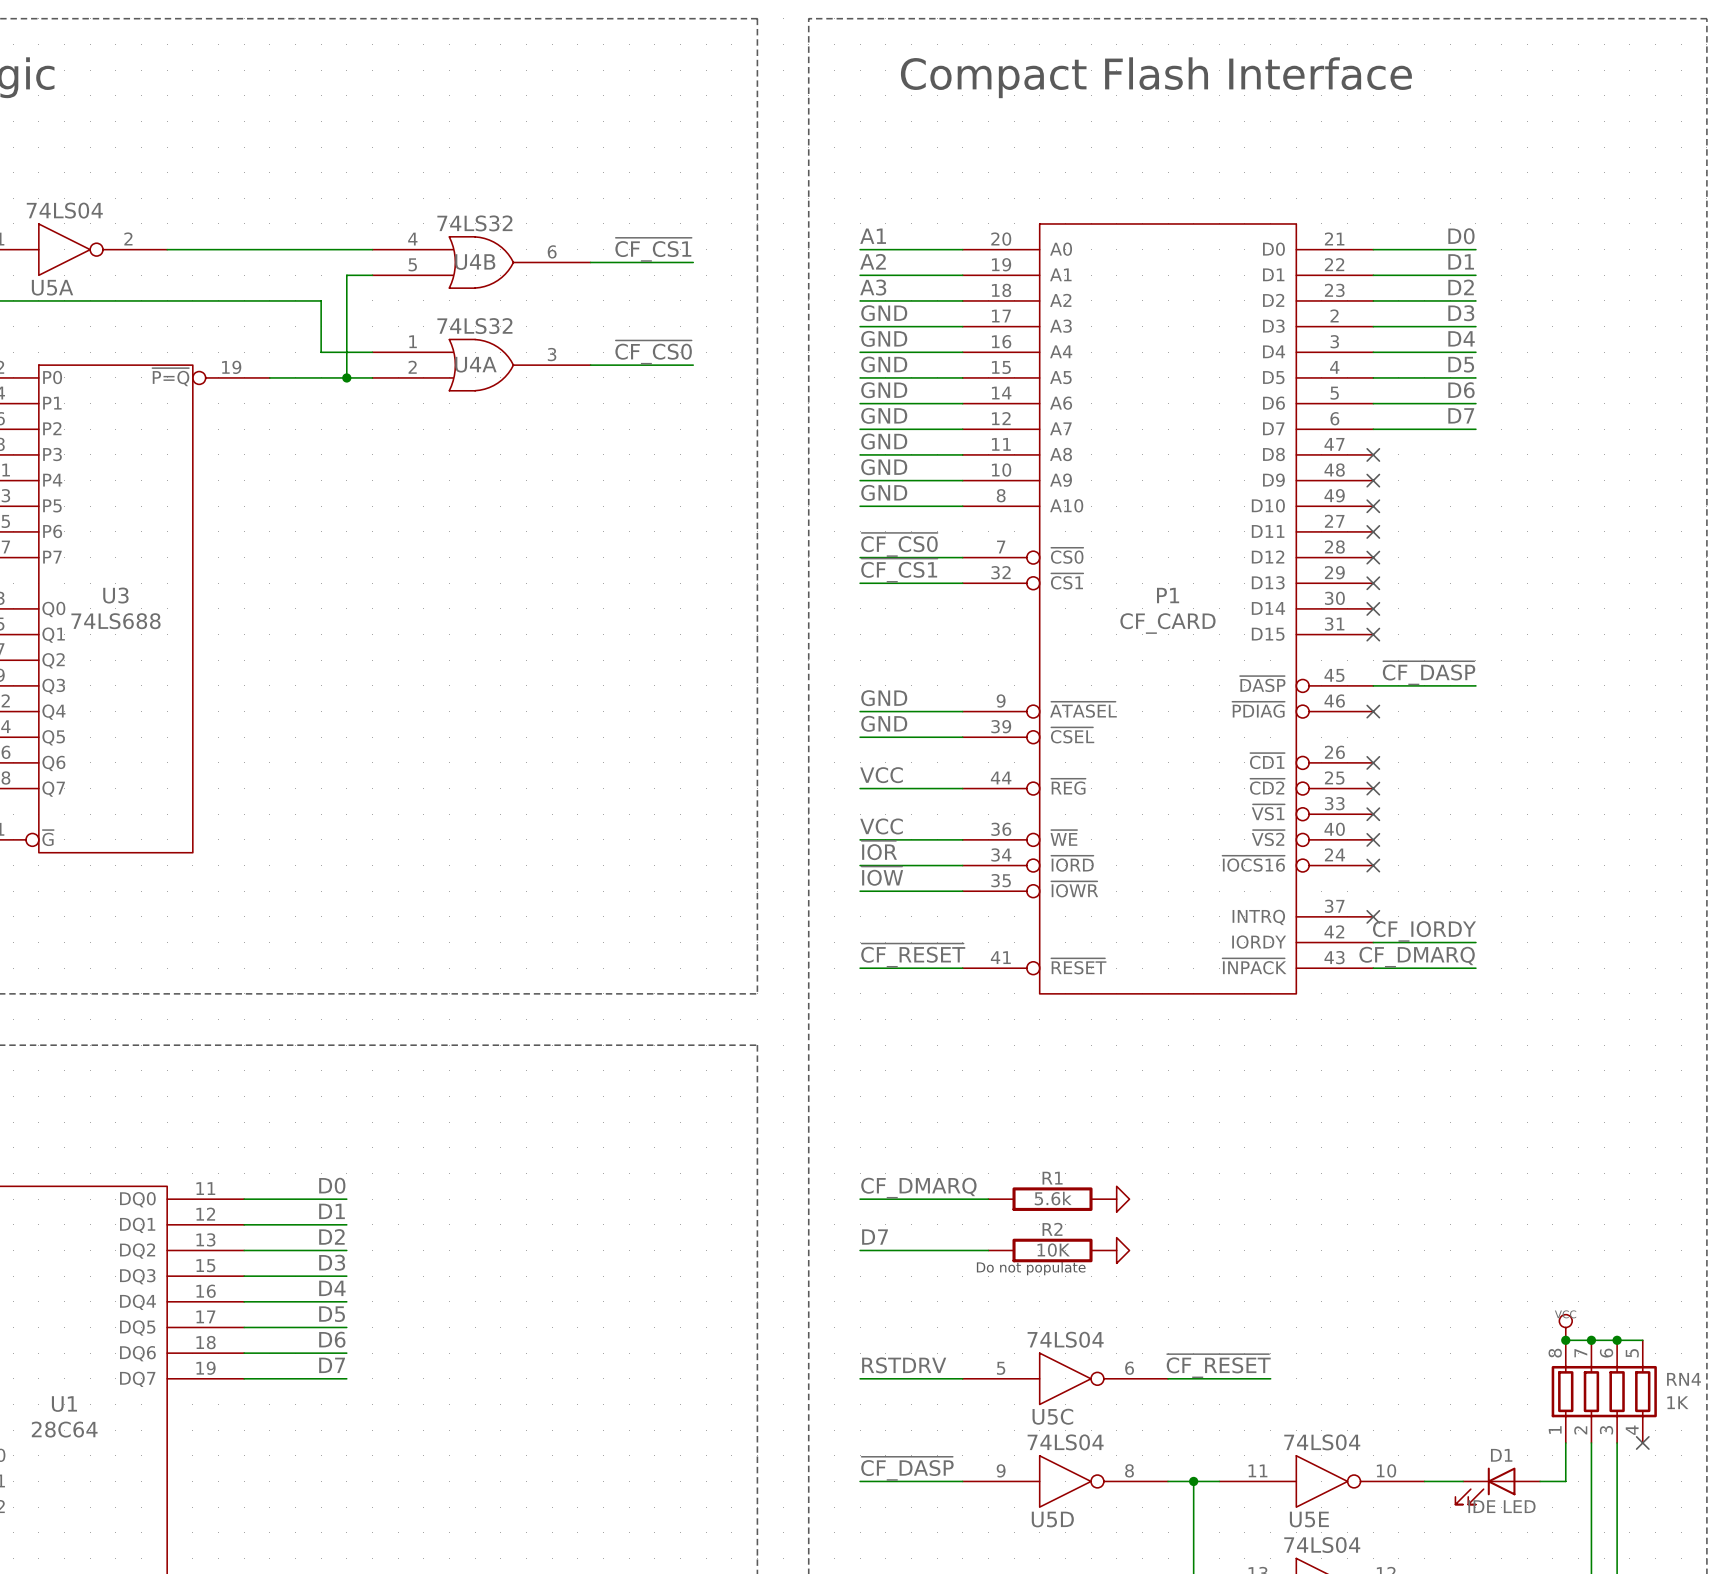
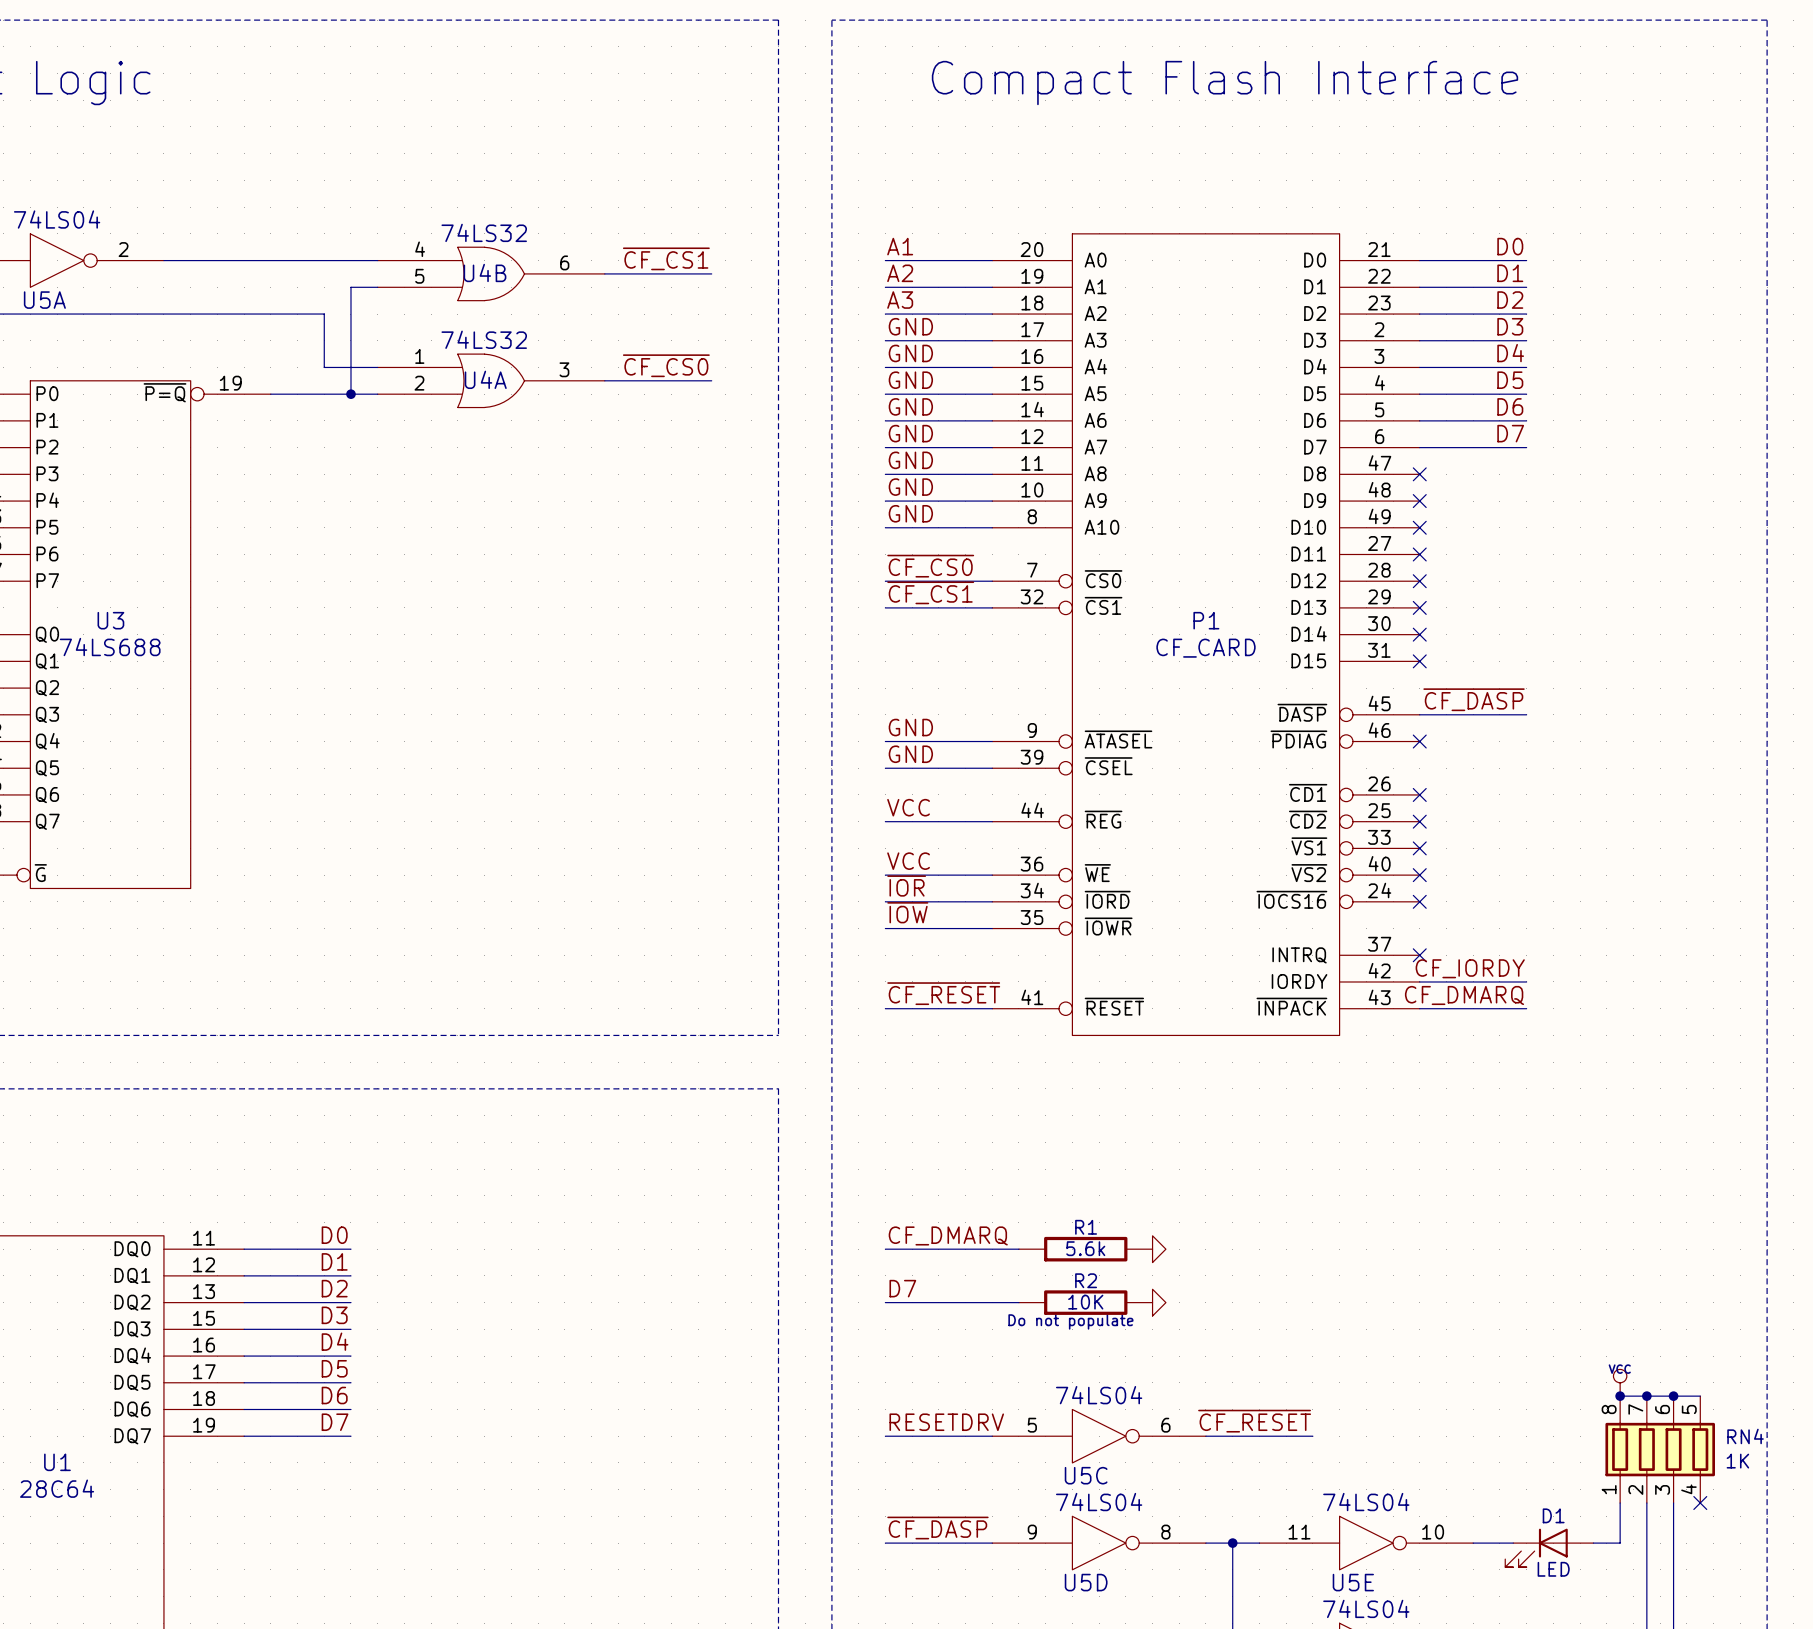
label: RSTDRV (904, 1365) -> RESETDRV (946, 1422)
D1 value: IDE LED (1501, 1506) -> LED (1553, 1569)

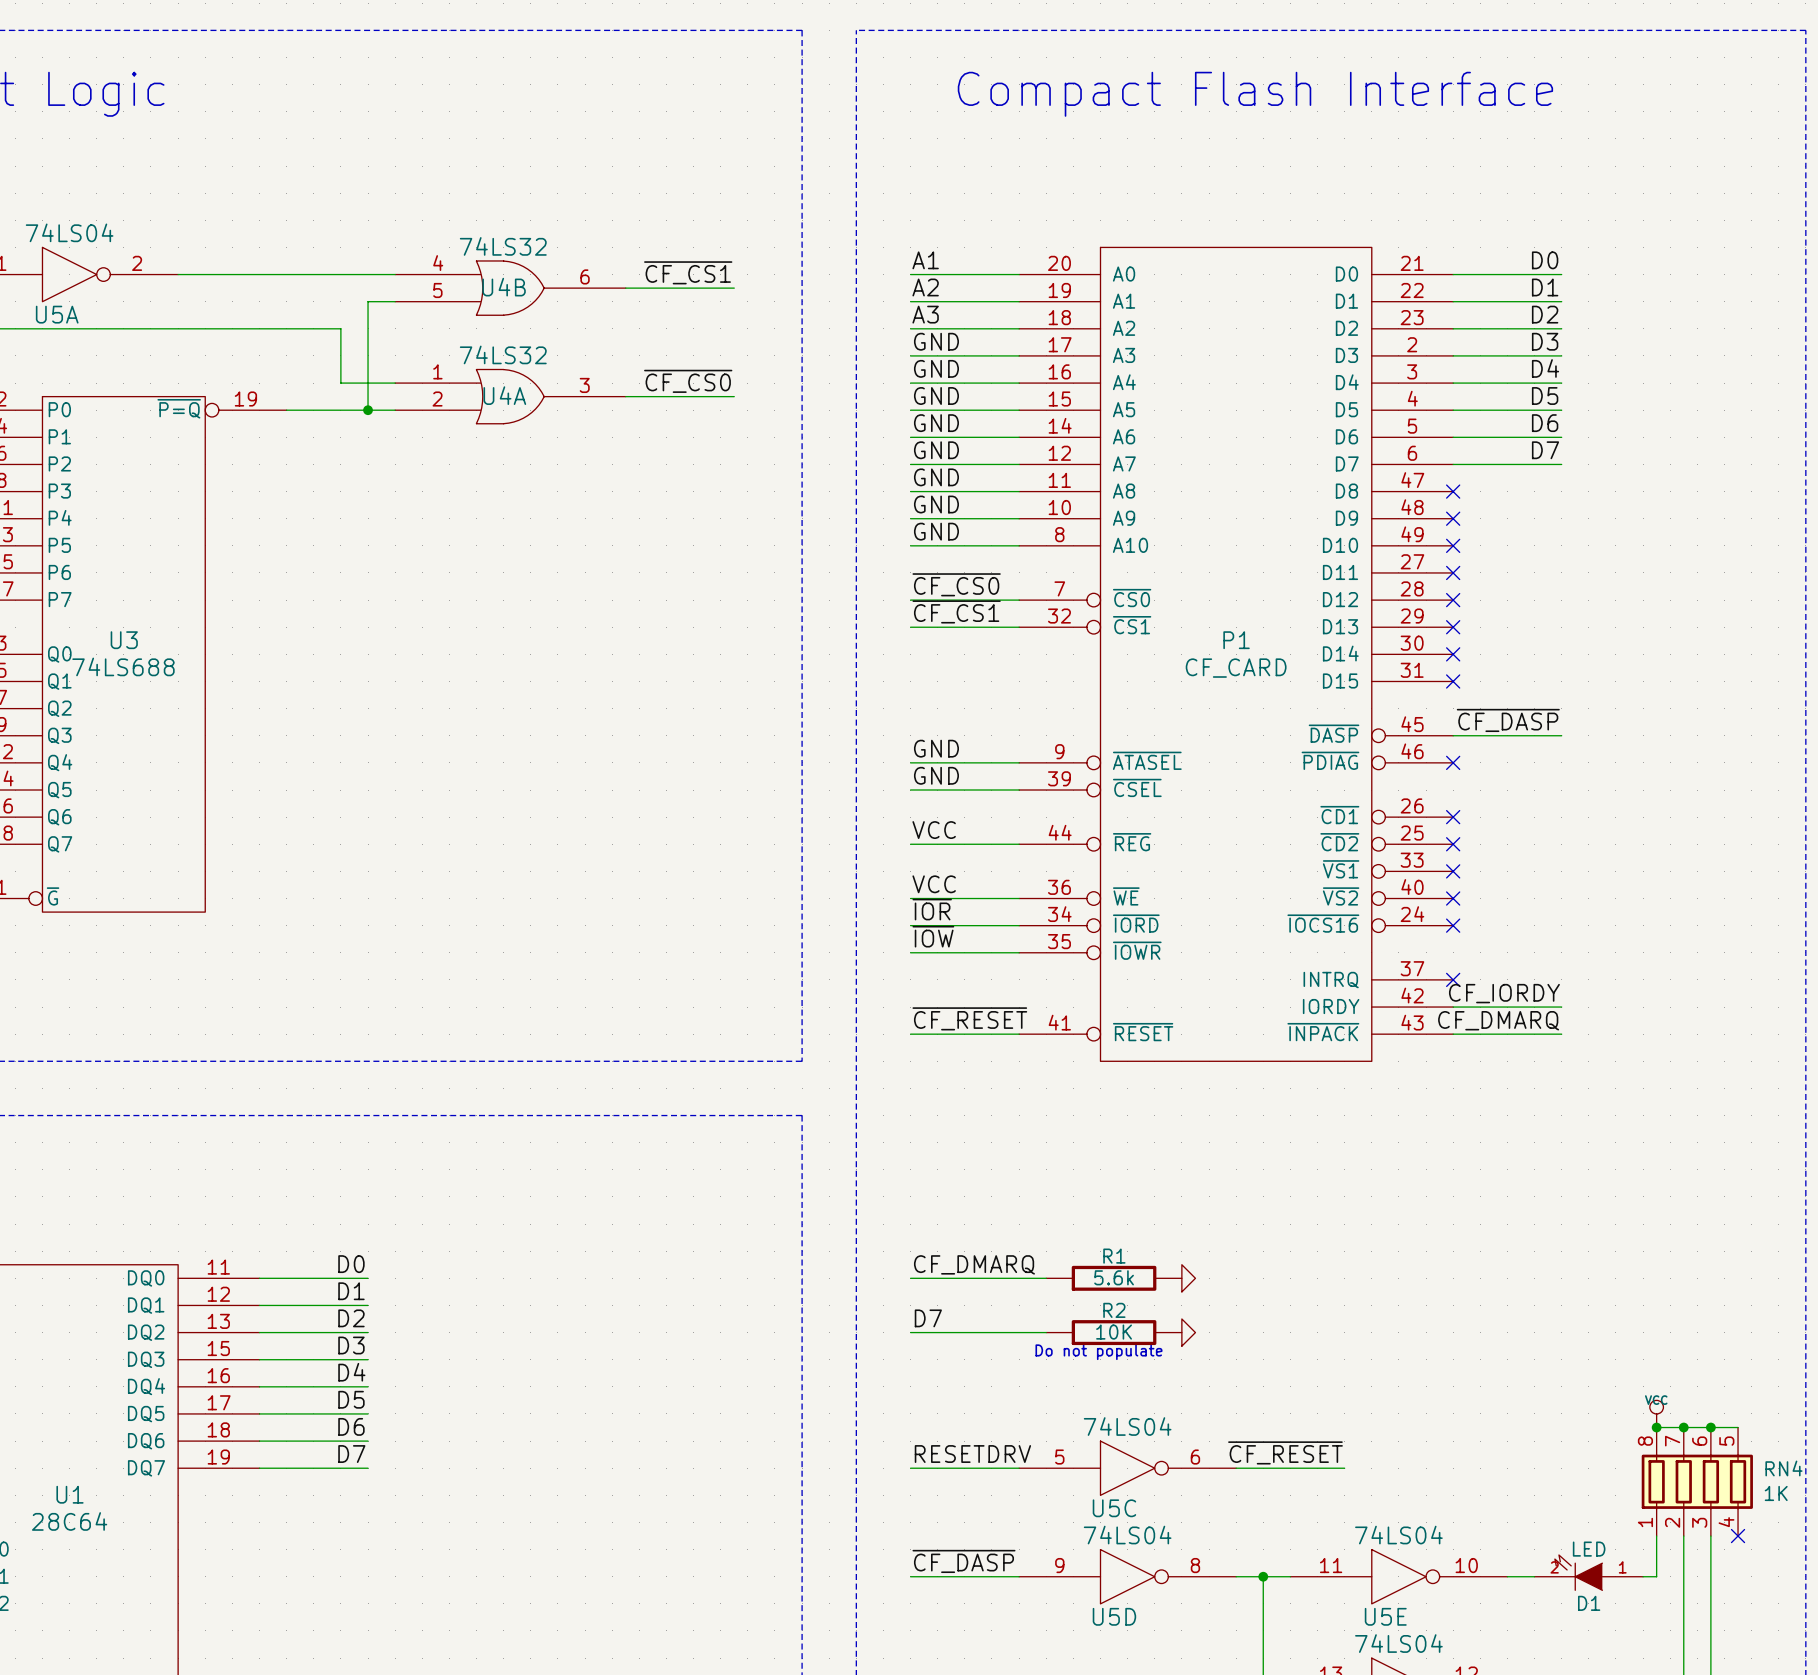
D1 name position: D1 (1553, 1515) -> D1 (1589, 1603)
D1 symbol: [1505, 1528, 1594, 1568] -> [1534, 1555, 1644, 1591]
D1 value position: LED (1553, 1569) -> LED (1589, 1549)

